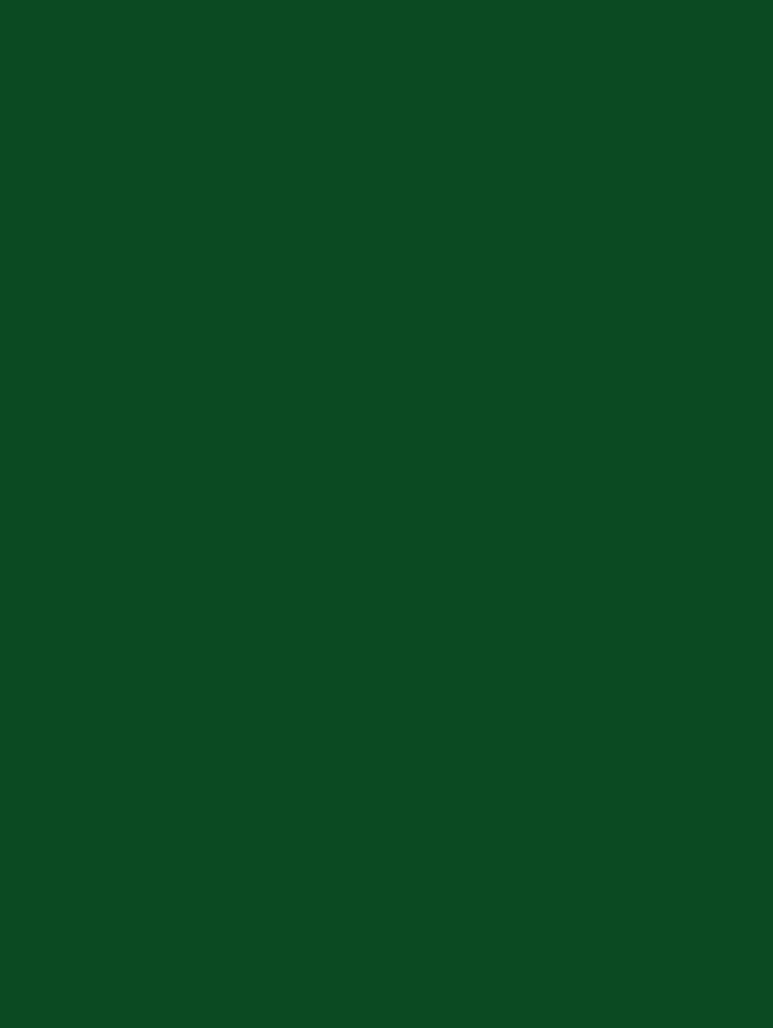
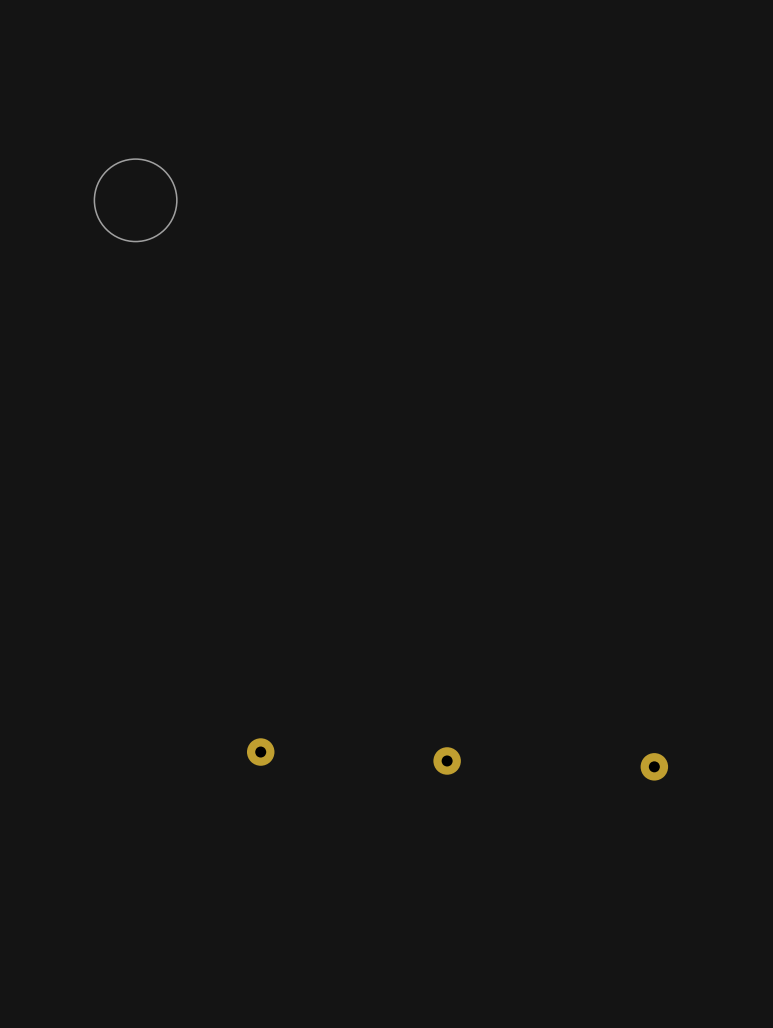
round board edge: none -> [94, 158, 178, 242]
via: none -> (260, 752)
via: none -> (447, 760)
via: none -> (654, 766)

